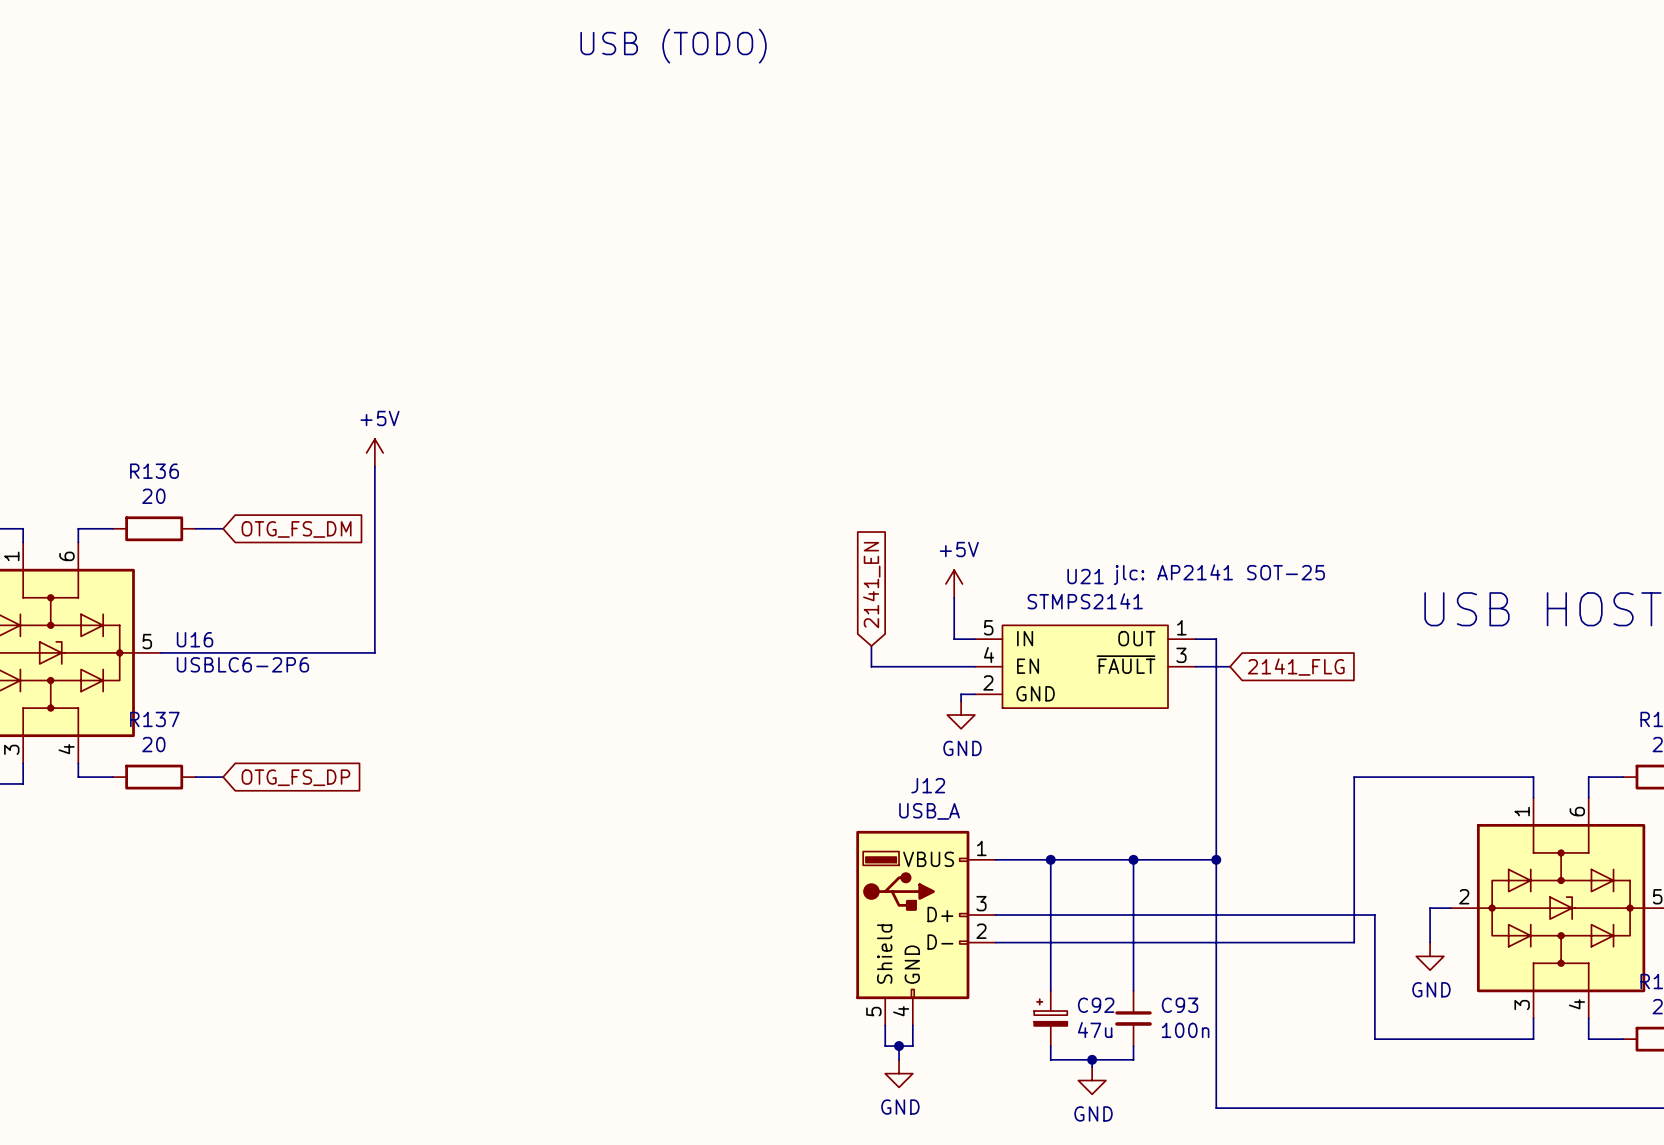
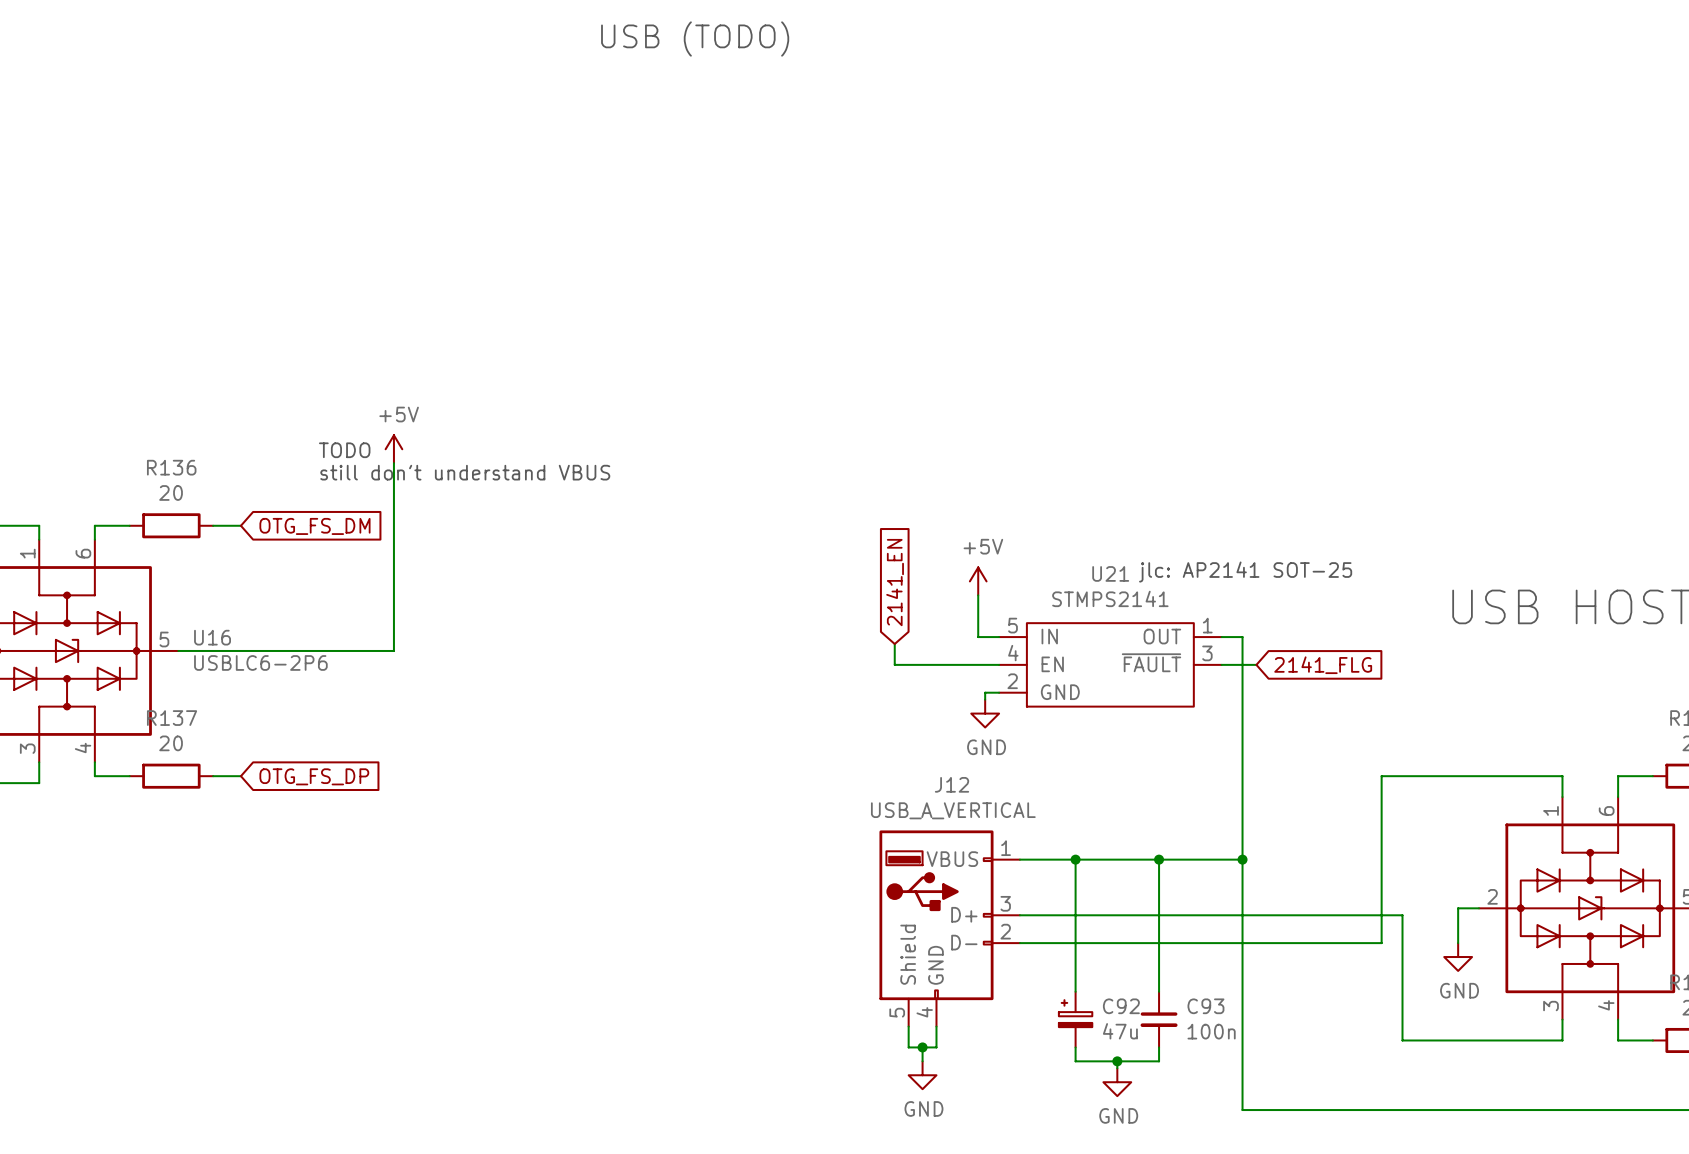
text: none -> TODO (344, 450)
text: none -> still don't understand VBUS (465, 472)
J12 value: USB_A (929, 811) -> USB_A_VERTICAL (953, 810)

